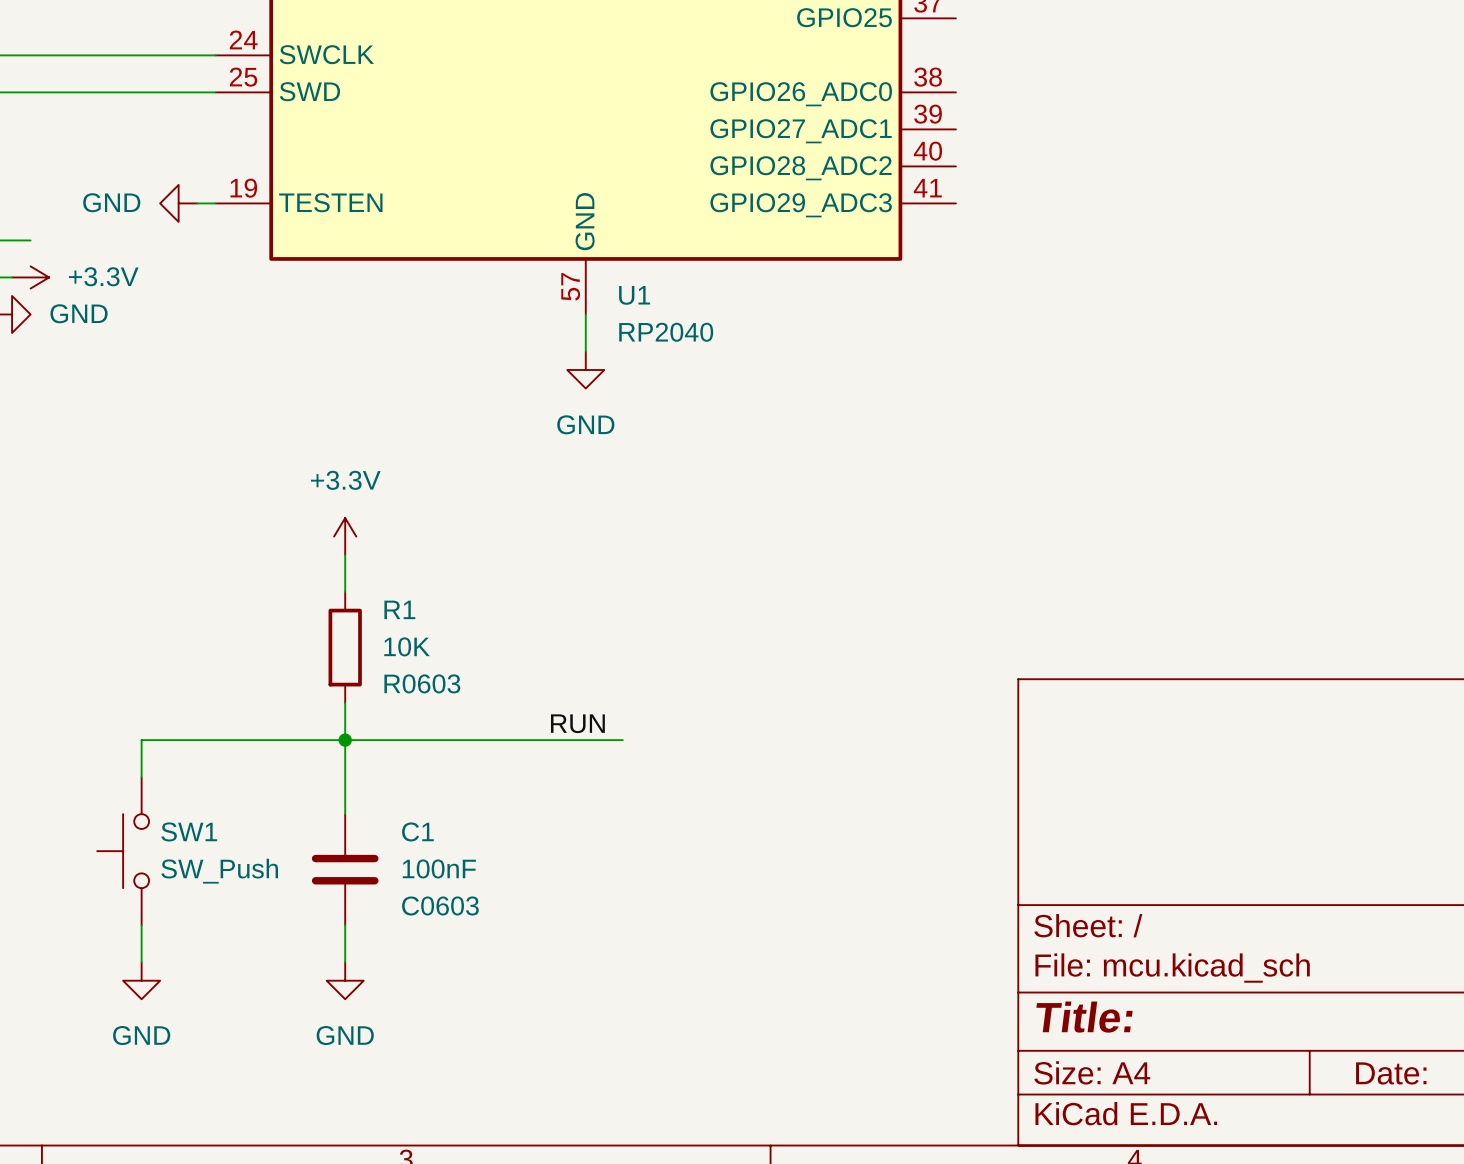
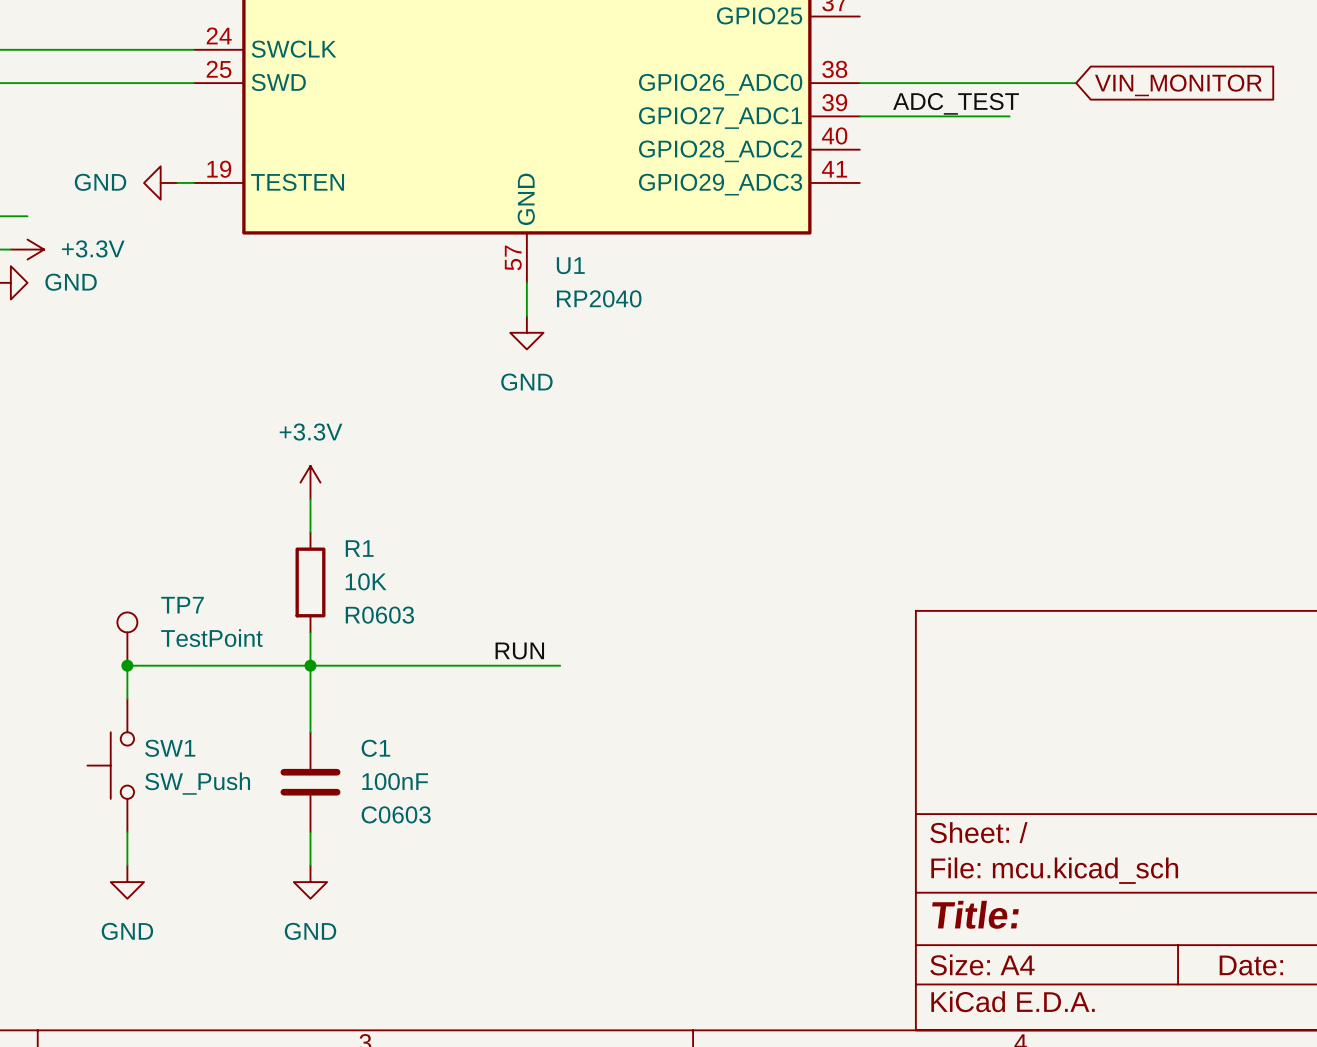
wire: none -> (859, 83) (1076, 83)
global label: none -> VIN_MONITOR (1178, 85)
label: none -> ADC_TEST (956, 103)
wire: none -> (859, 116) (1009, 116)
TP7: none -> TestPoint (127, 639)
junction: none -> (127, 665)

